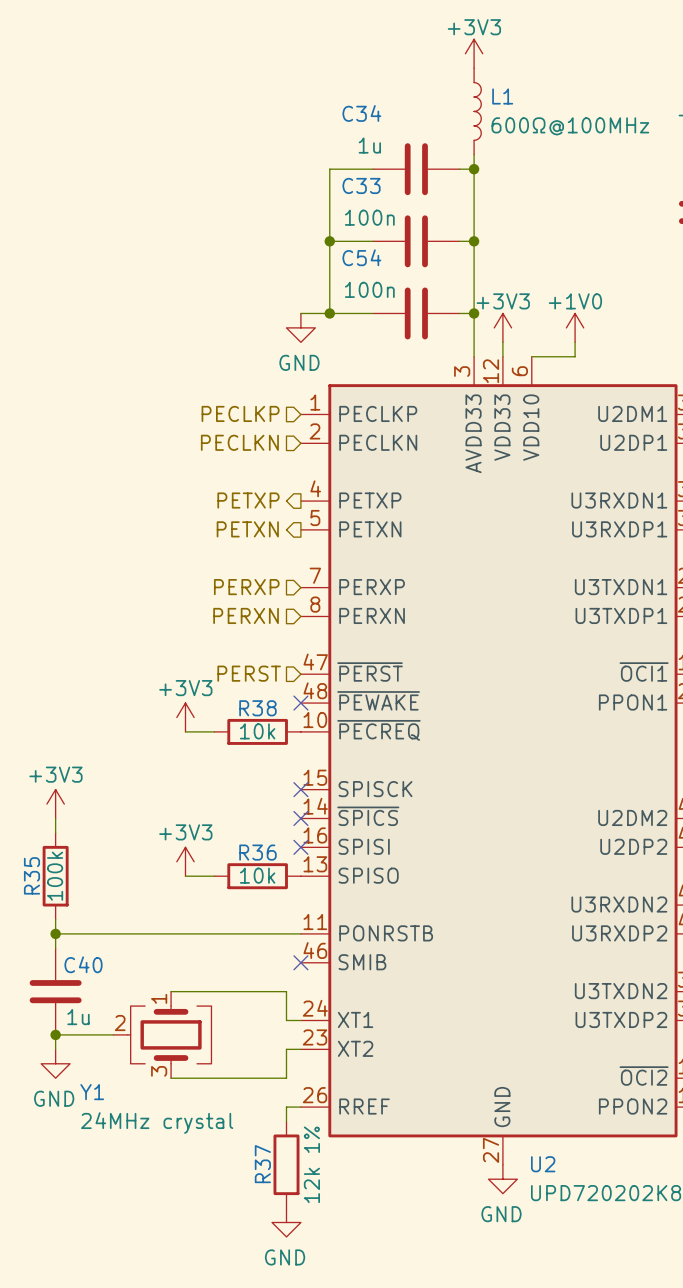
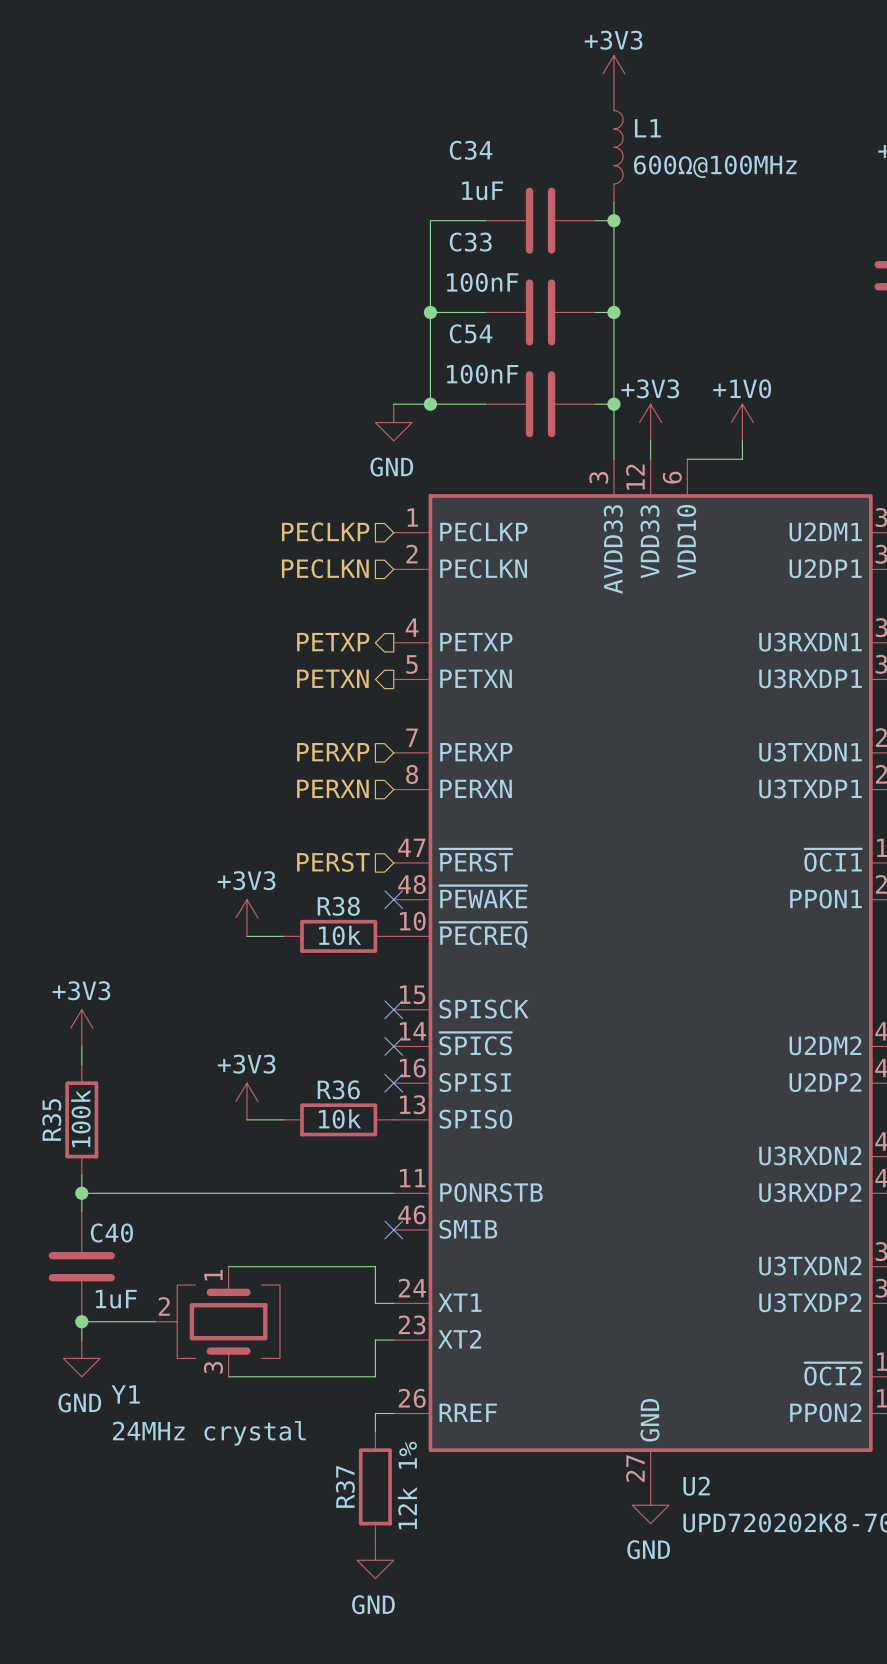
C34 value: 1u (369, 145) -> 1uF (482, 190)
C33 value: 100n (369, 217) -> 100nF (482, 282)
C54 value: 100n (369, 289) -> 100nF (482, 374)
C40 value: 1u (78, 1017) -> 1uF (116, 1299)

